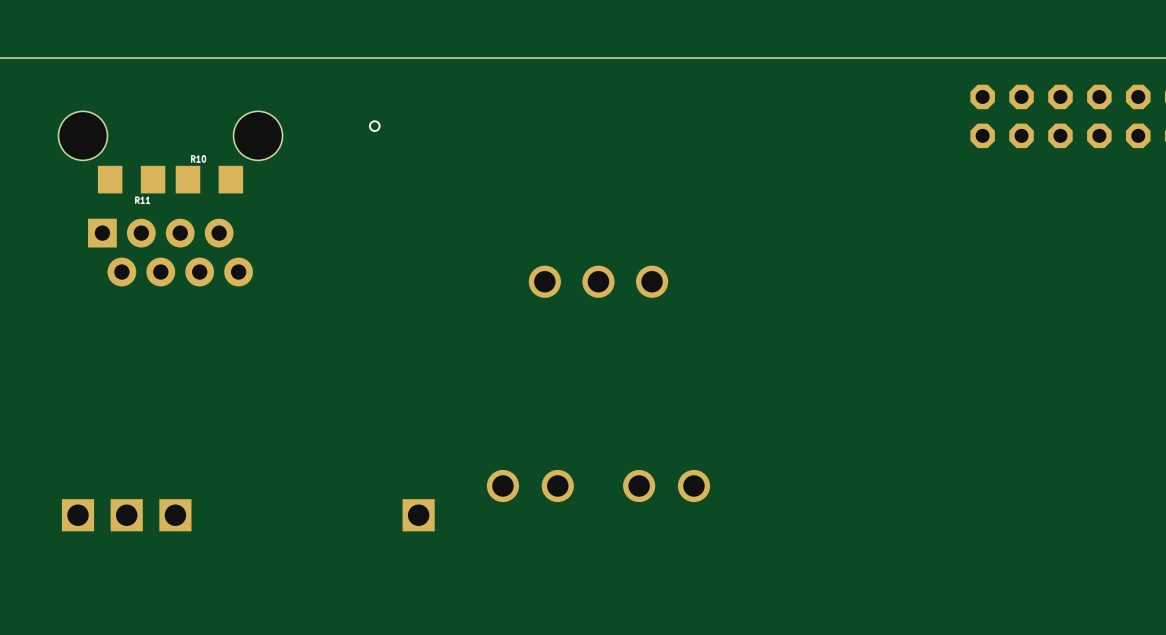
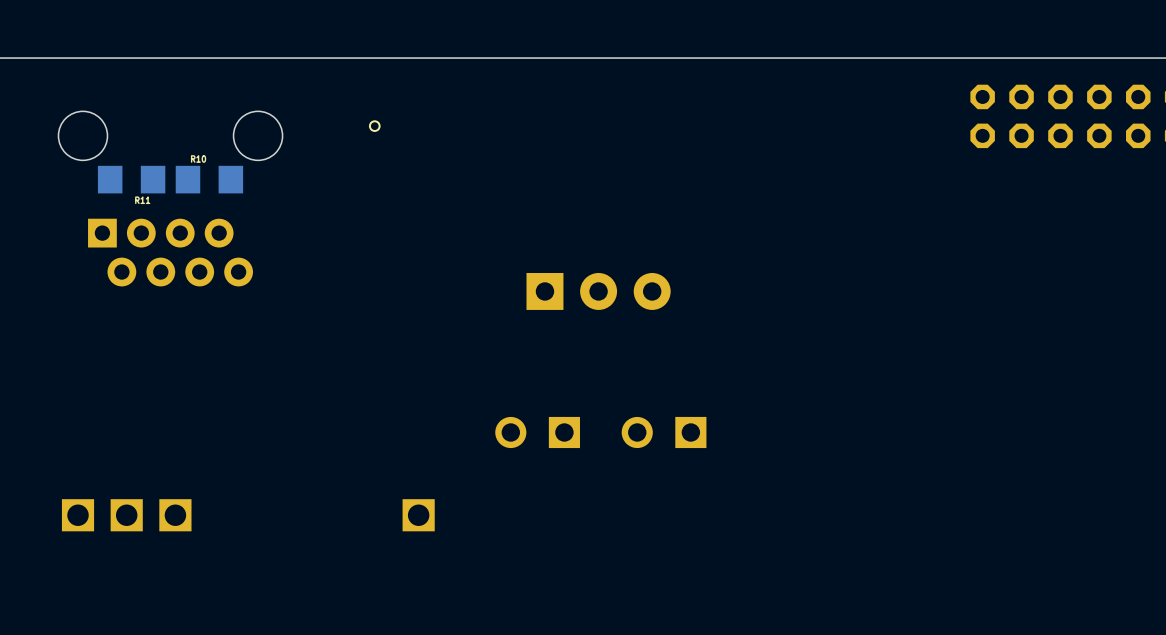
part footprint: [528, 265, 669, 298] -> [526, 272, 671, 310]
part: none -> (537, 432)
part: none -> (664, 432)
part: (530, 485) -> none
part: (666, 485) -> none

